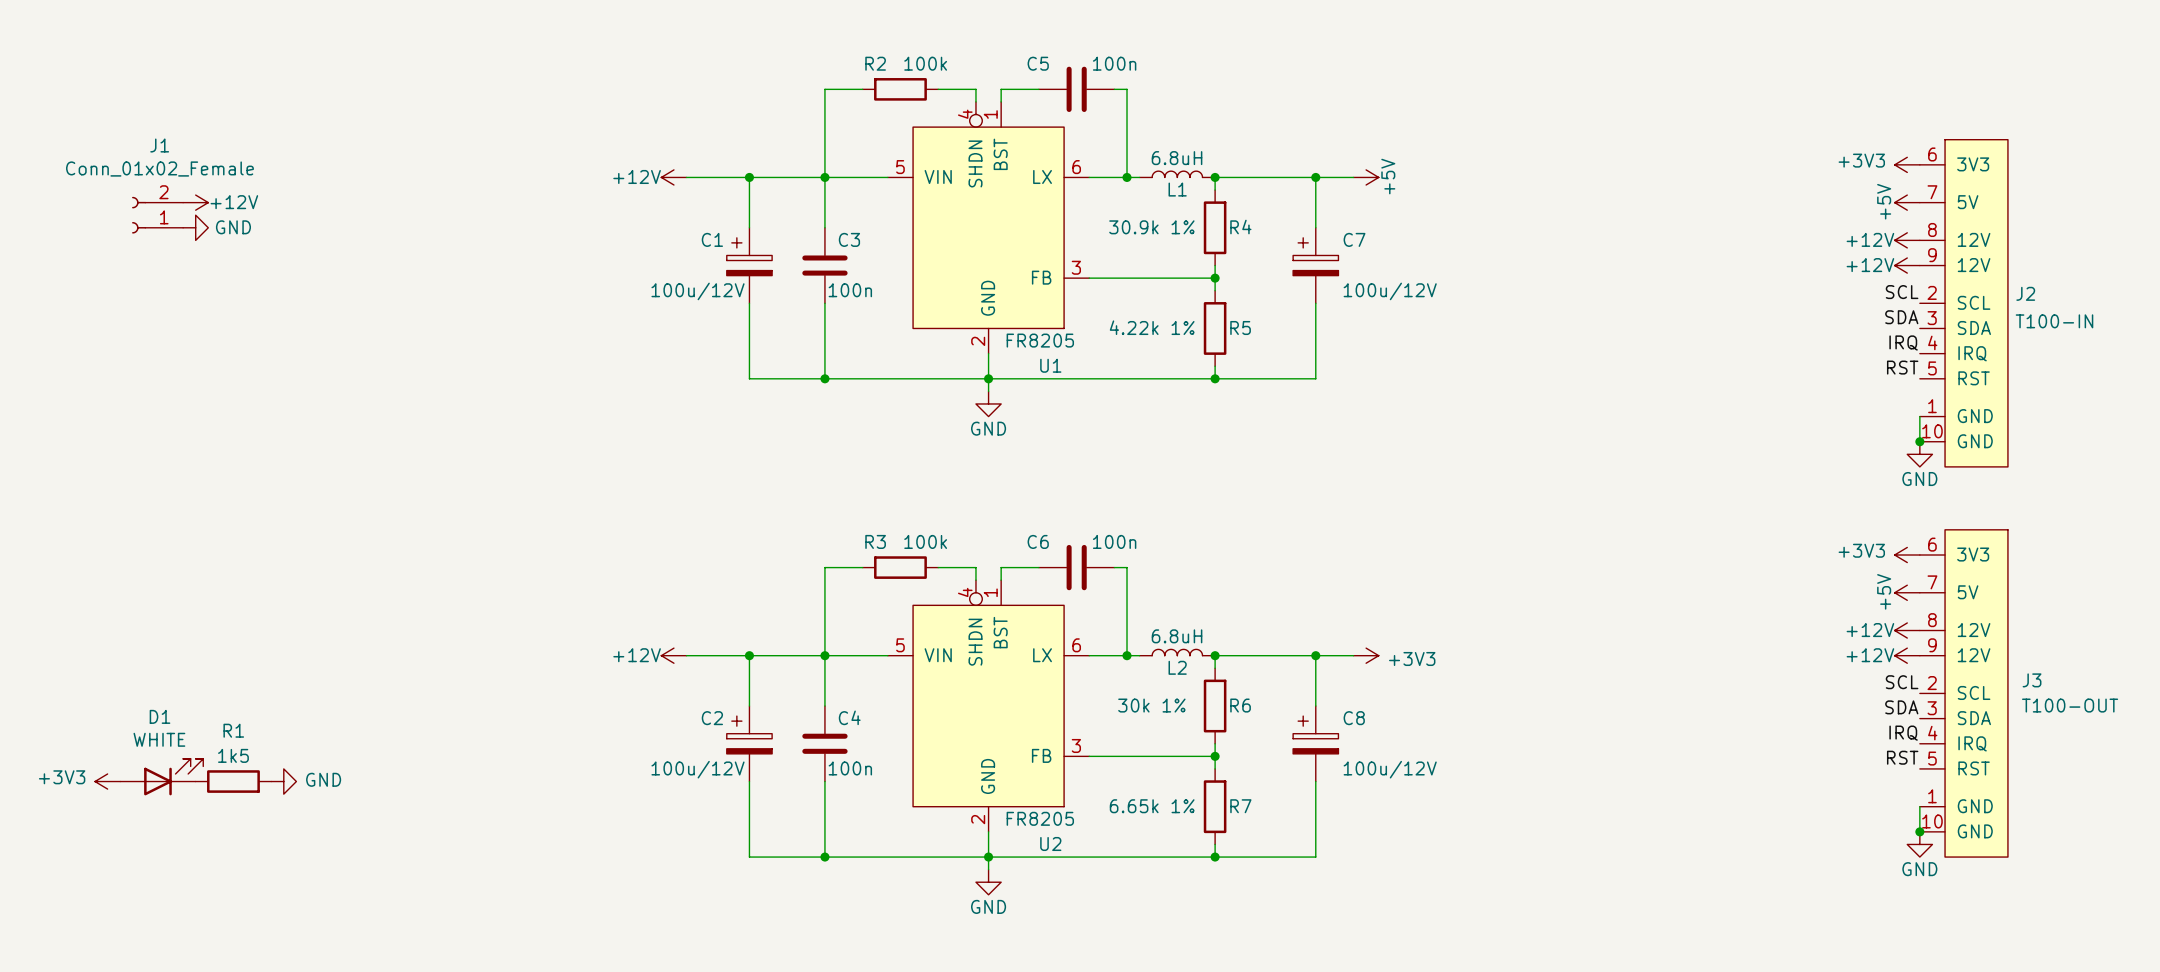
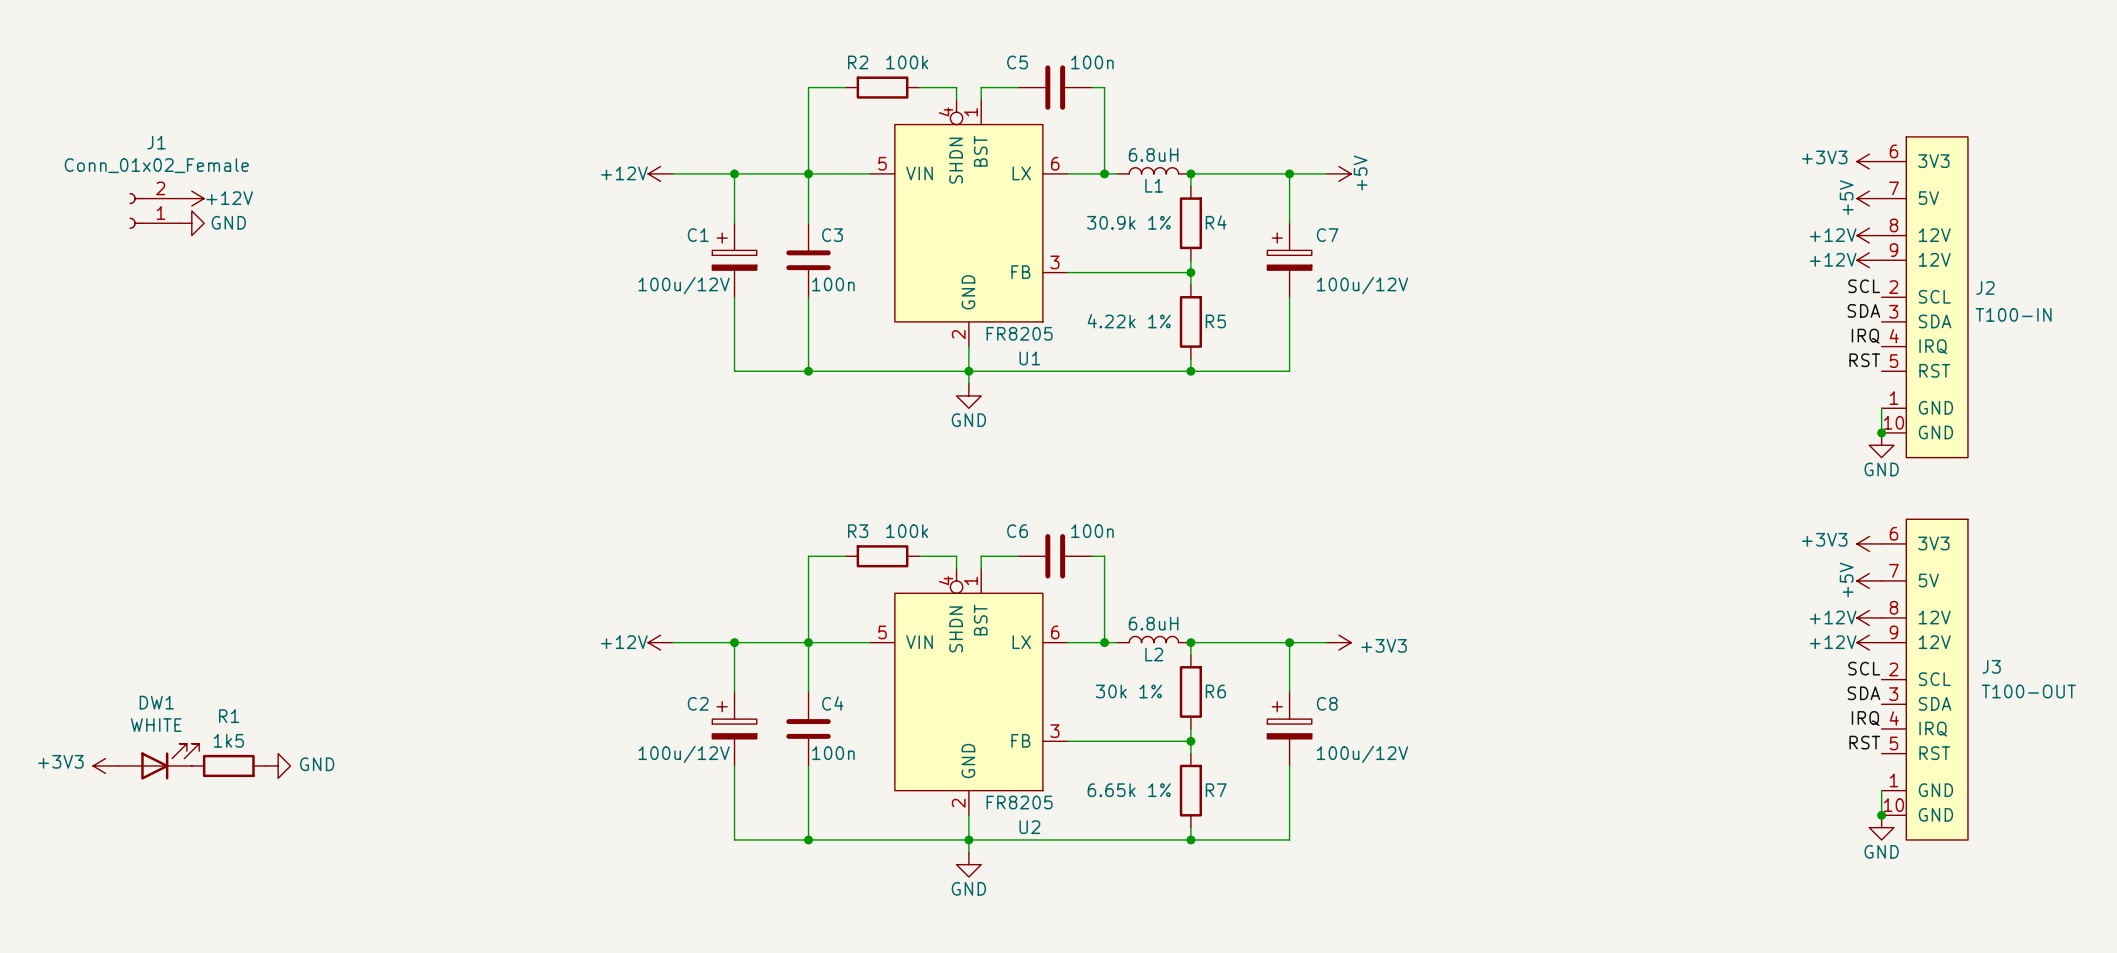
D1 name: D1 (160, 716) -> DW1 (156, 702)

